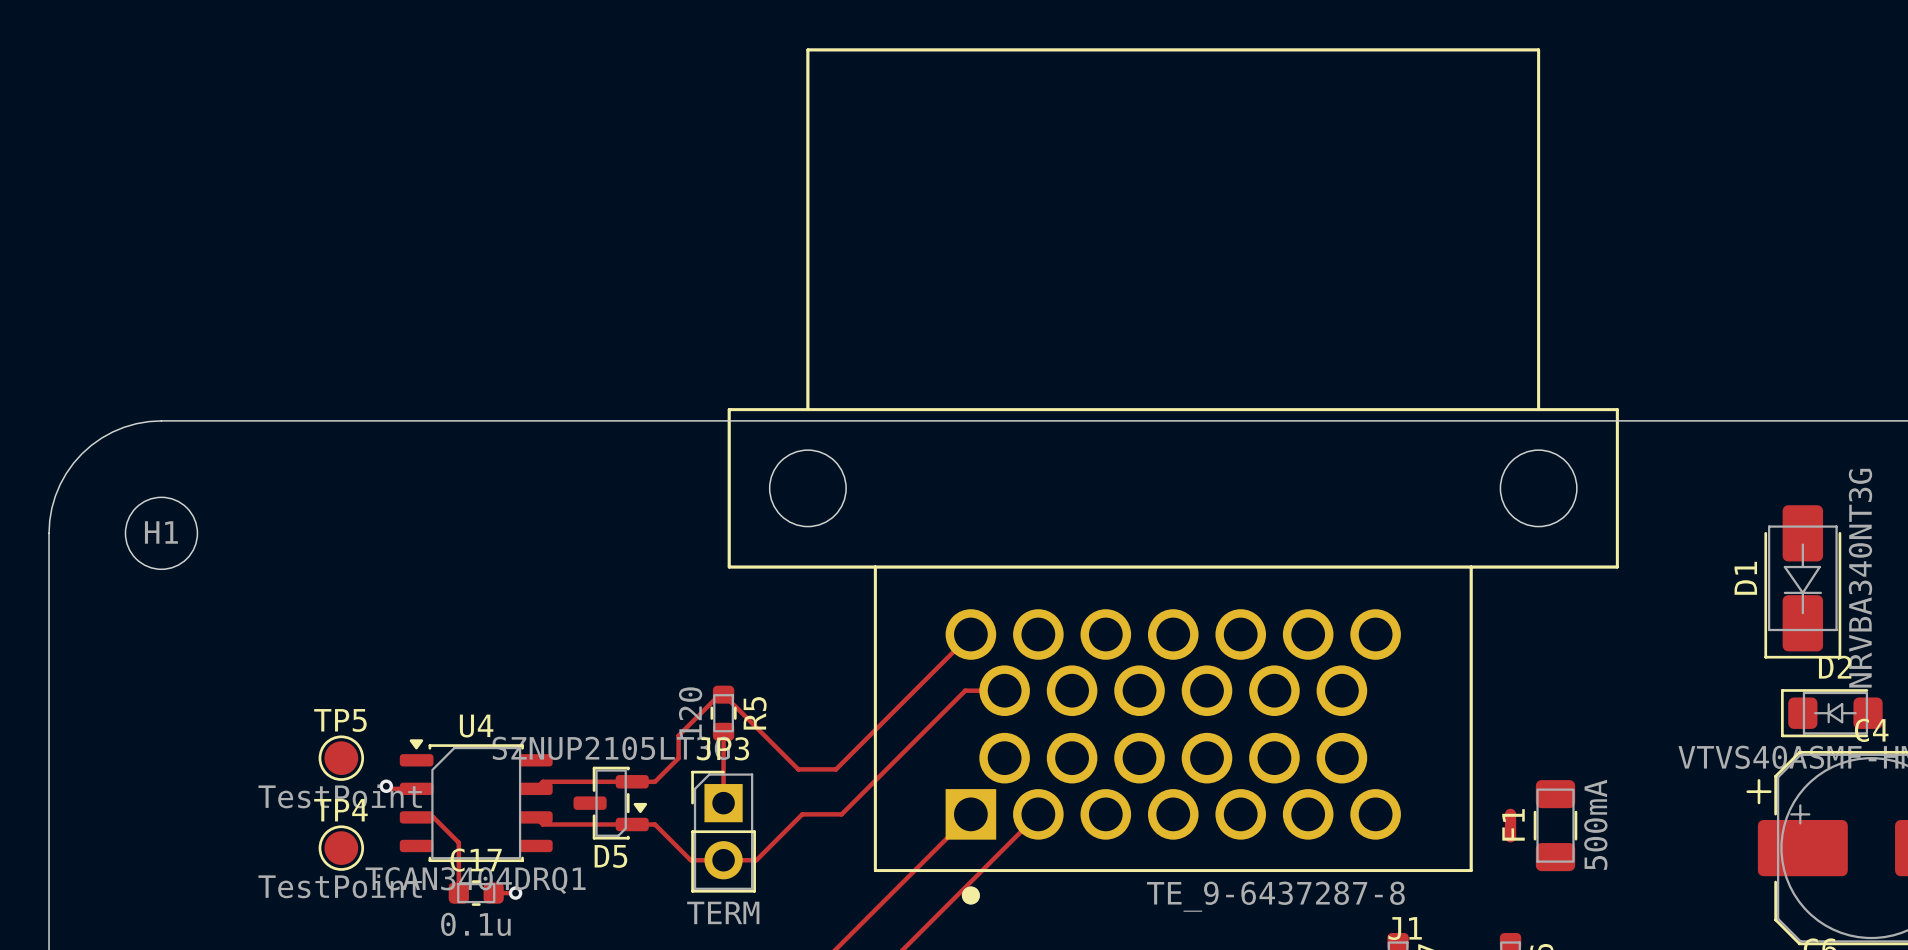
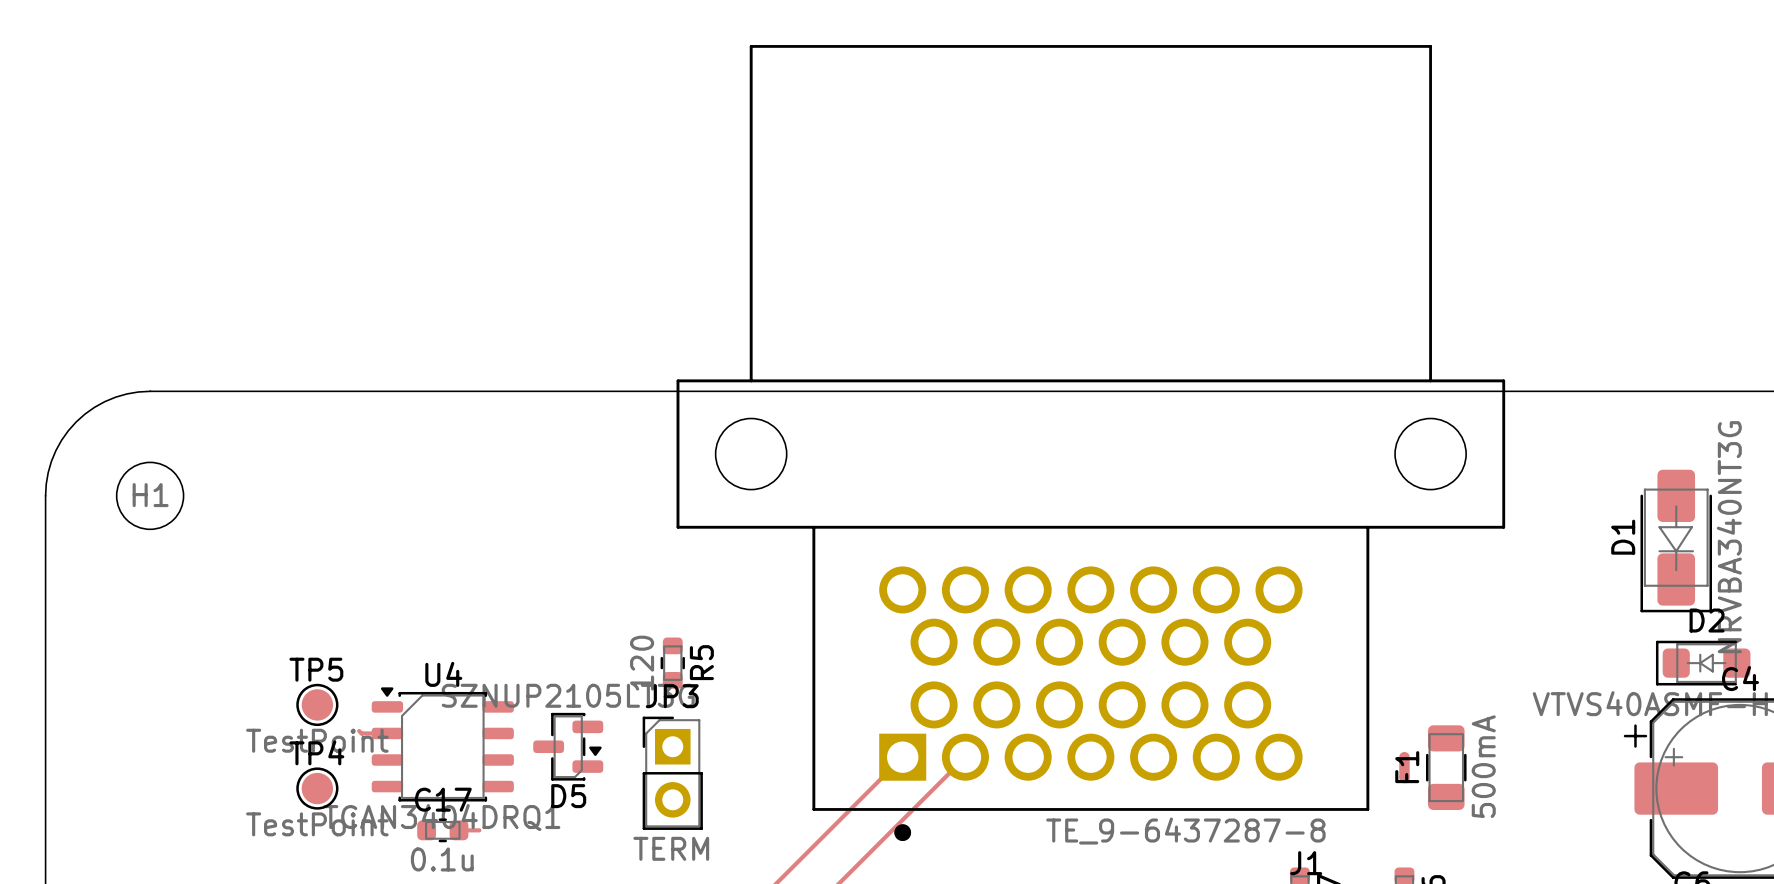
track: (970, 634) (835, 769) (798, 769) (723, 694) (719, 694) (678, 735) (678, 758) (654, 781) (542, 781) (535, 788) -> none
track: (1004, 690) (965, 690) (841, 814) (802, 814) (756, 860) (690, 860) (654, 824) (542, 824) (535, 817) -> none
track: (723, 731) (723, 803) -> none
via: (386, 786) -> none
track: (416, 817) (433, 817) (458, 842) (458, 893) -> none
via: (515, 893) -> none

